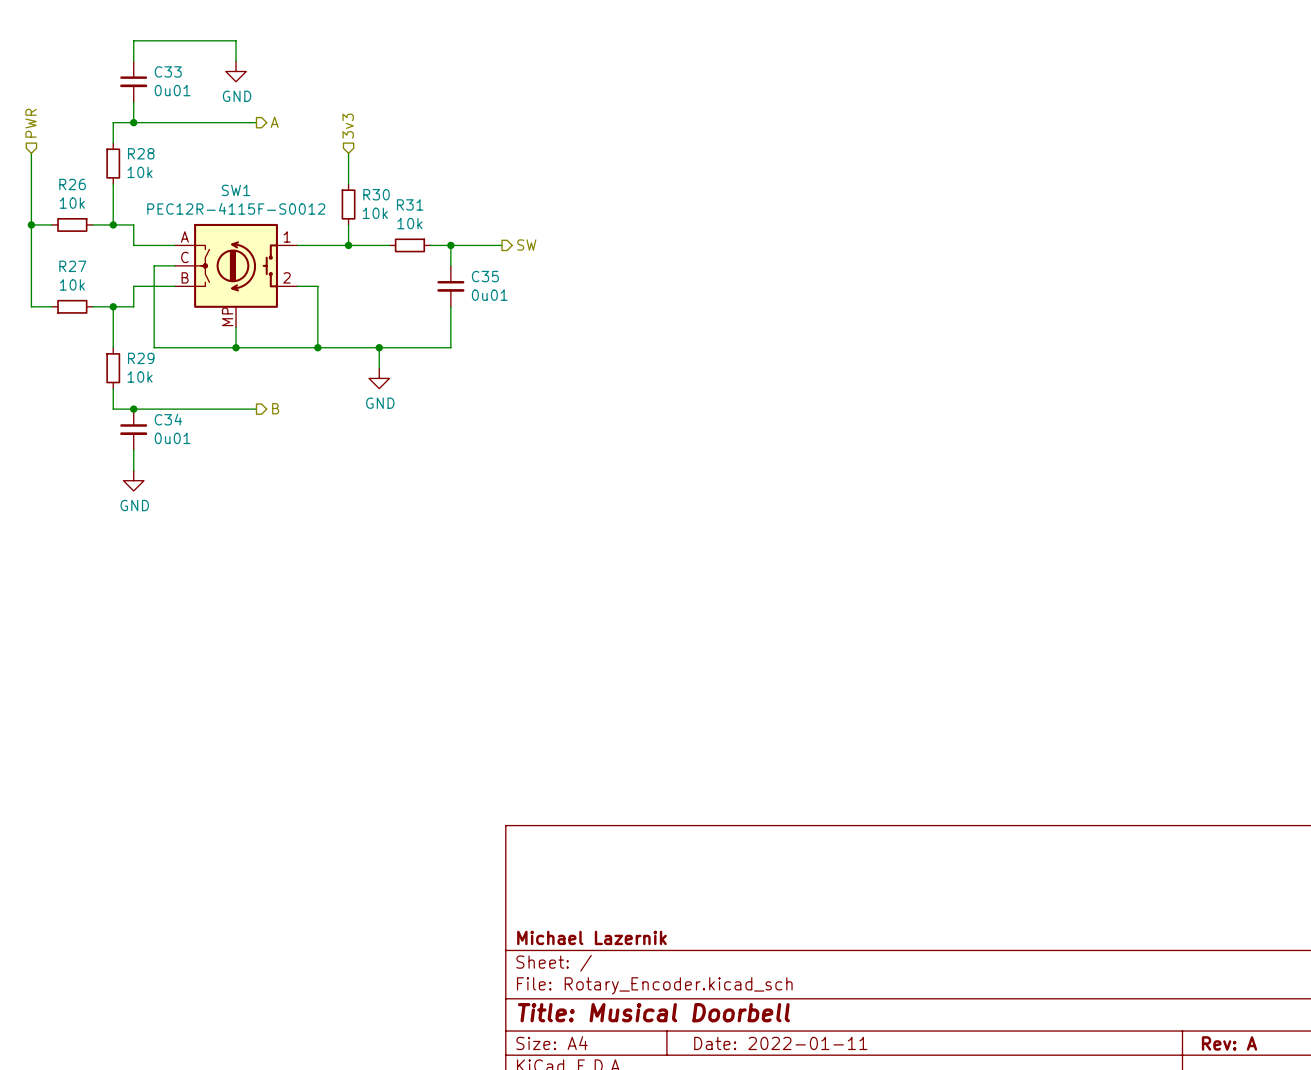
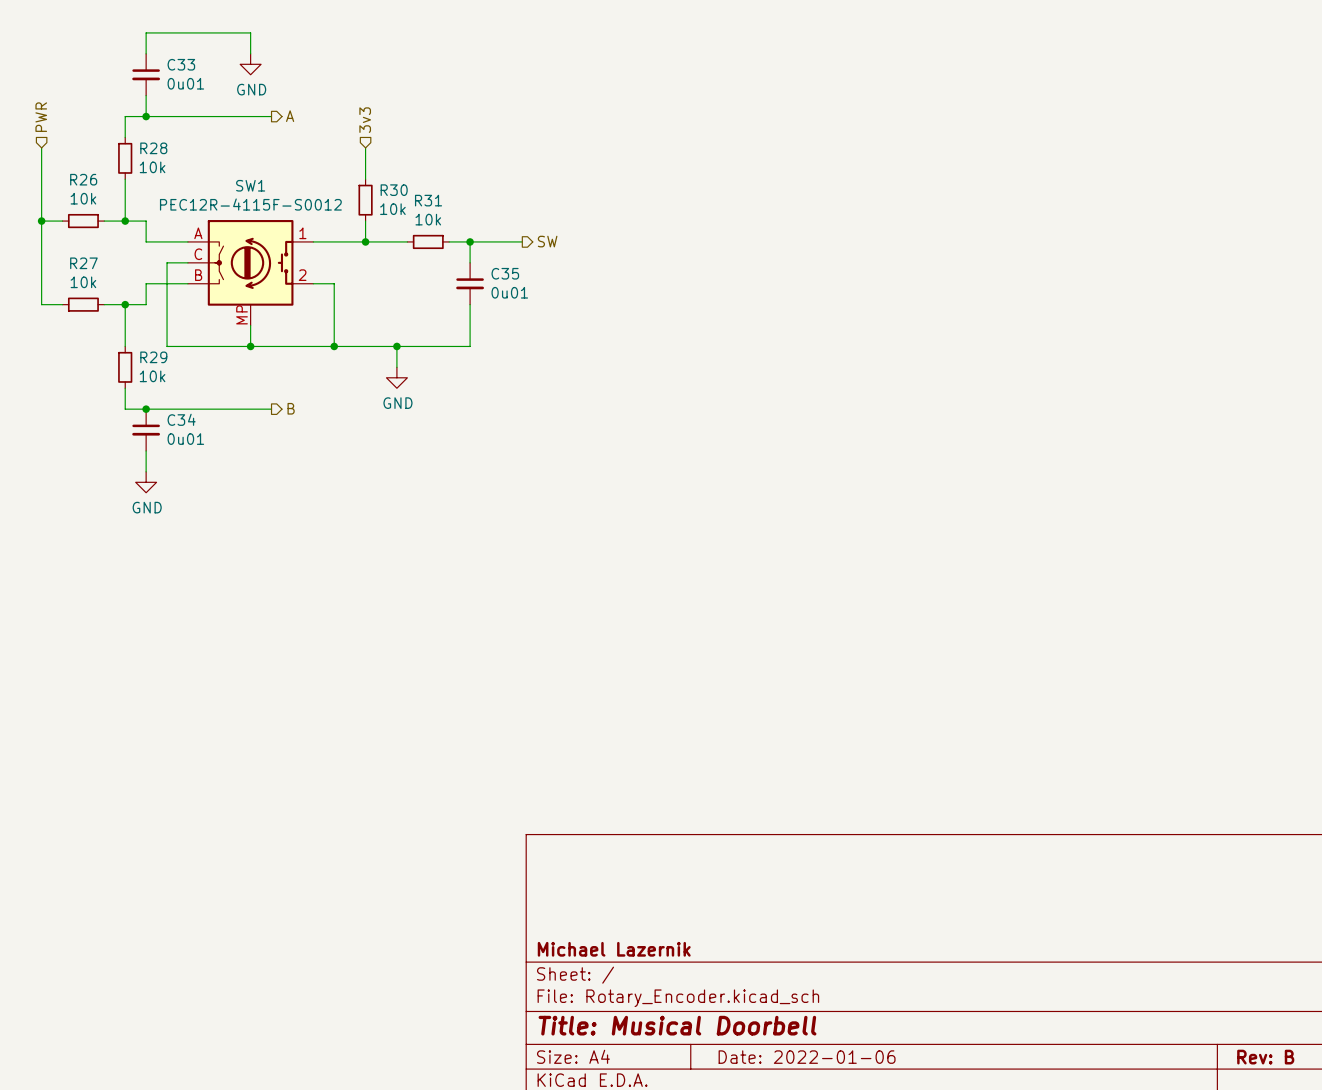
title block: Date: 2022-01-11 (780, 1043) -> Date: 2022-01-06 (807, 1057)
title block: Rev: A (1229, 1043) -> Rev: B (1265, 1057)

